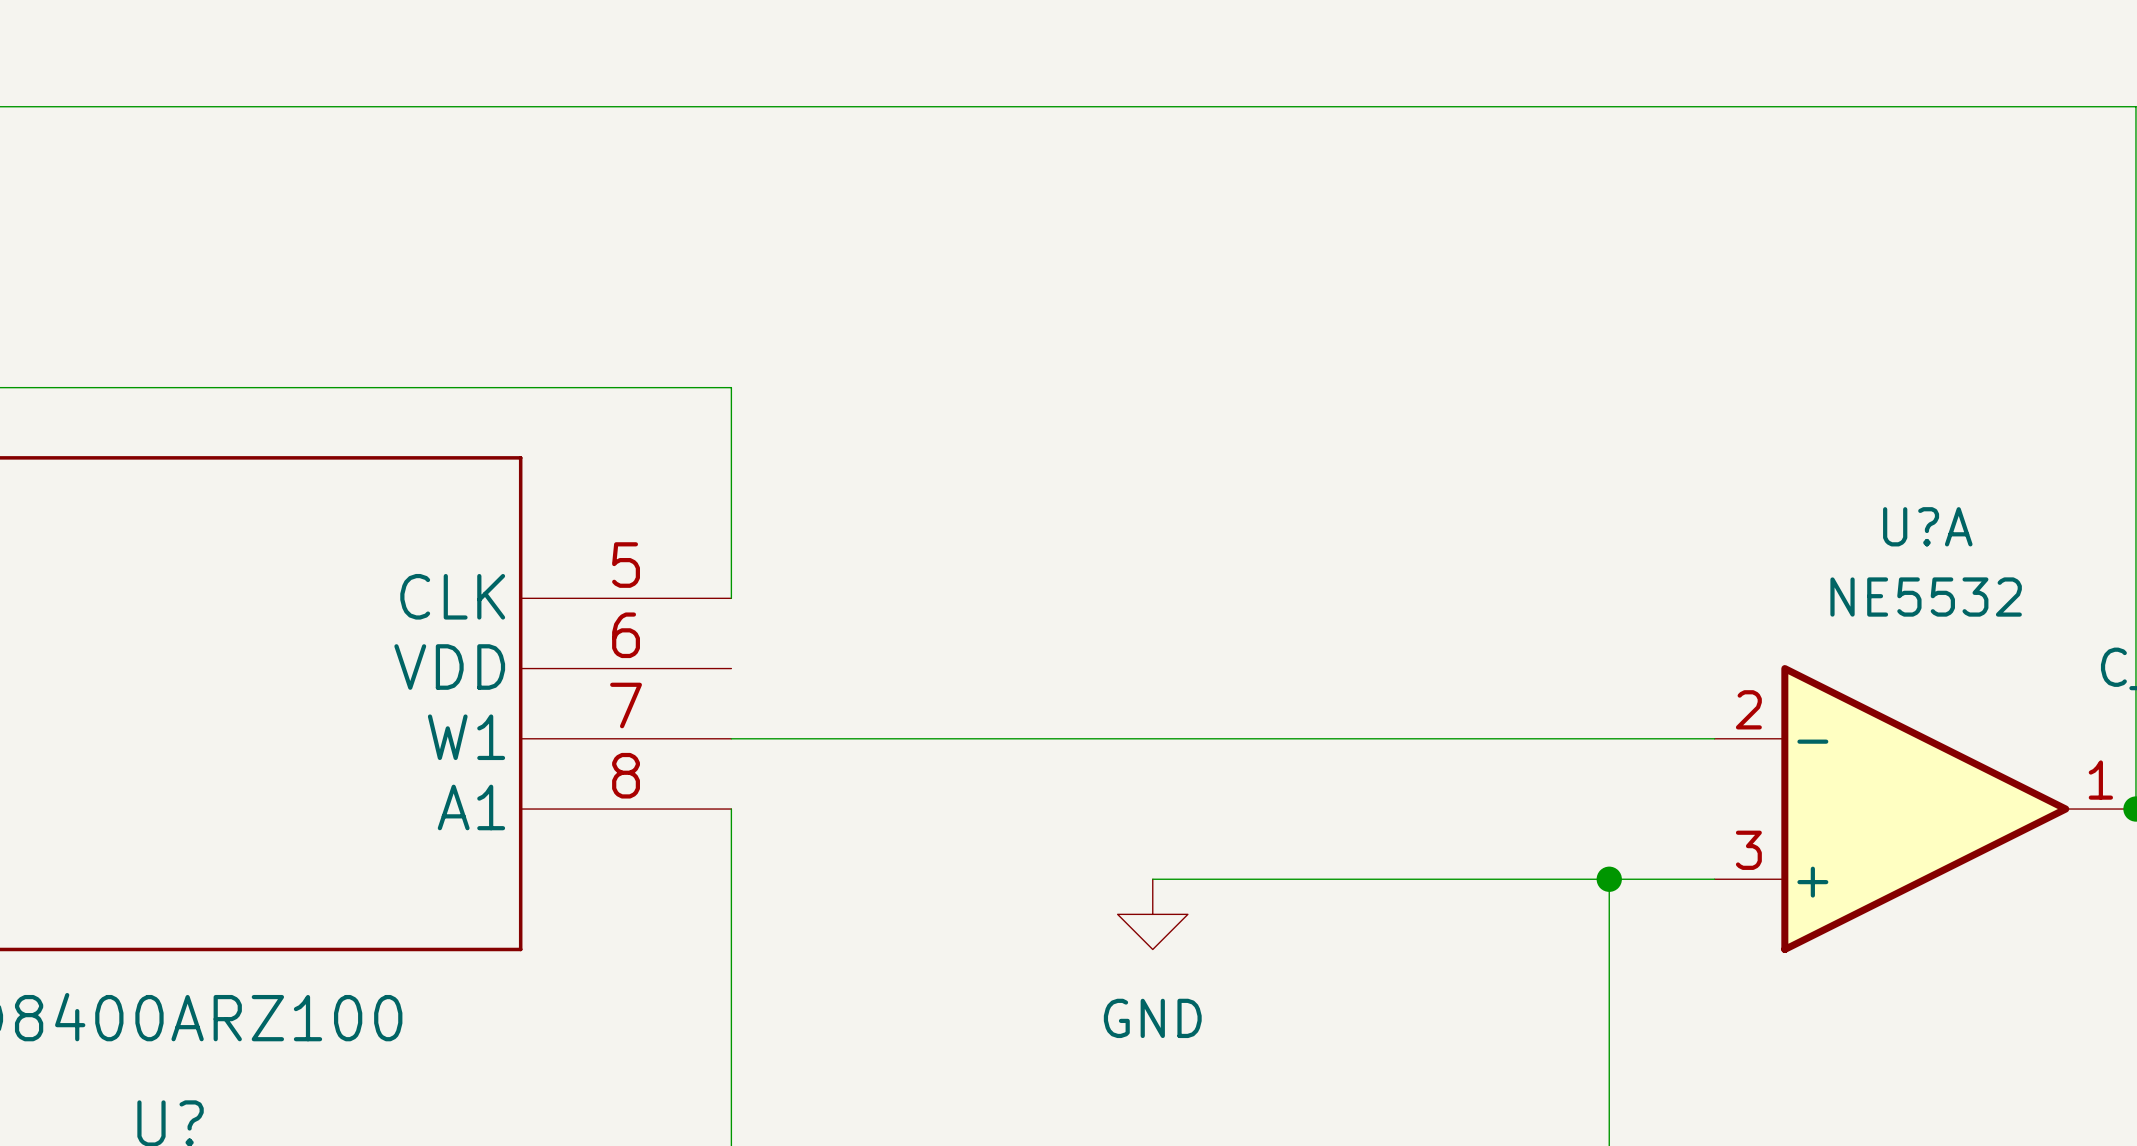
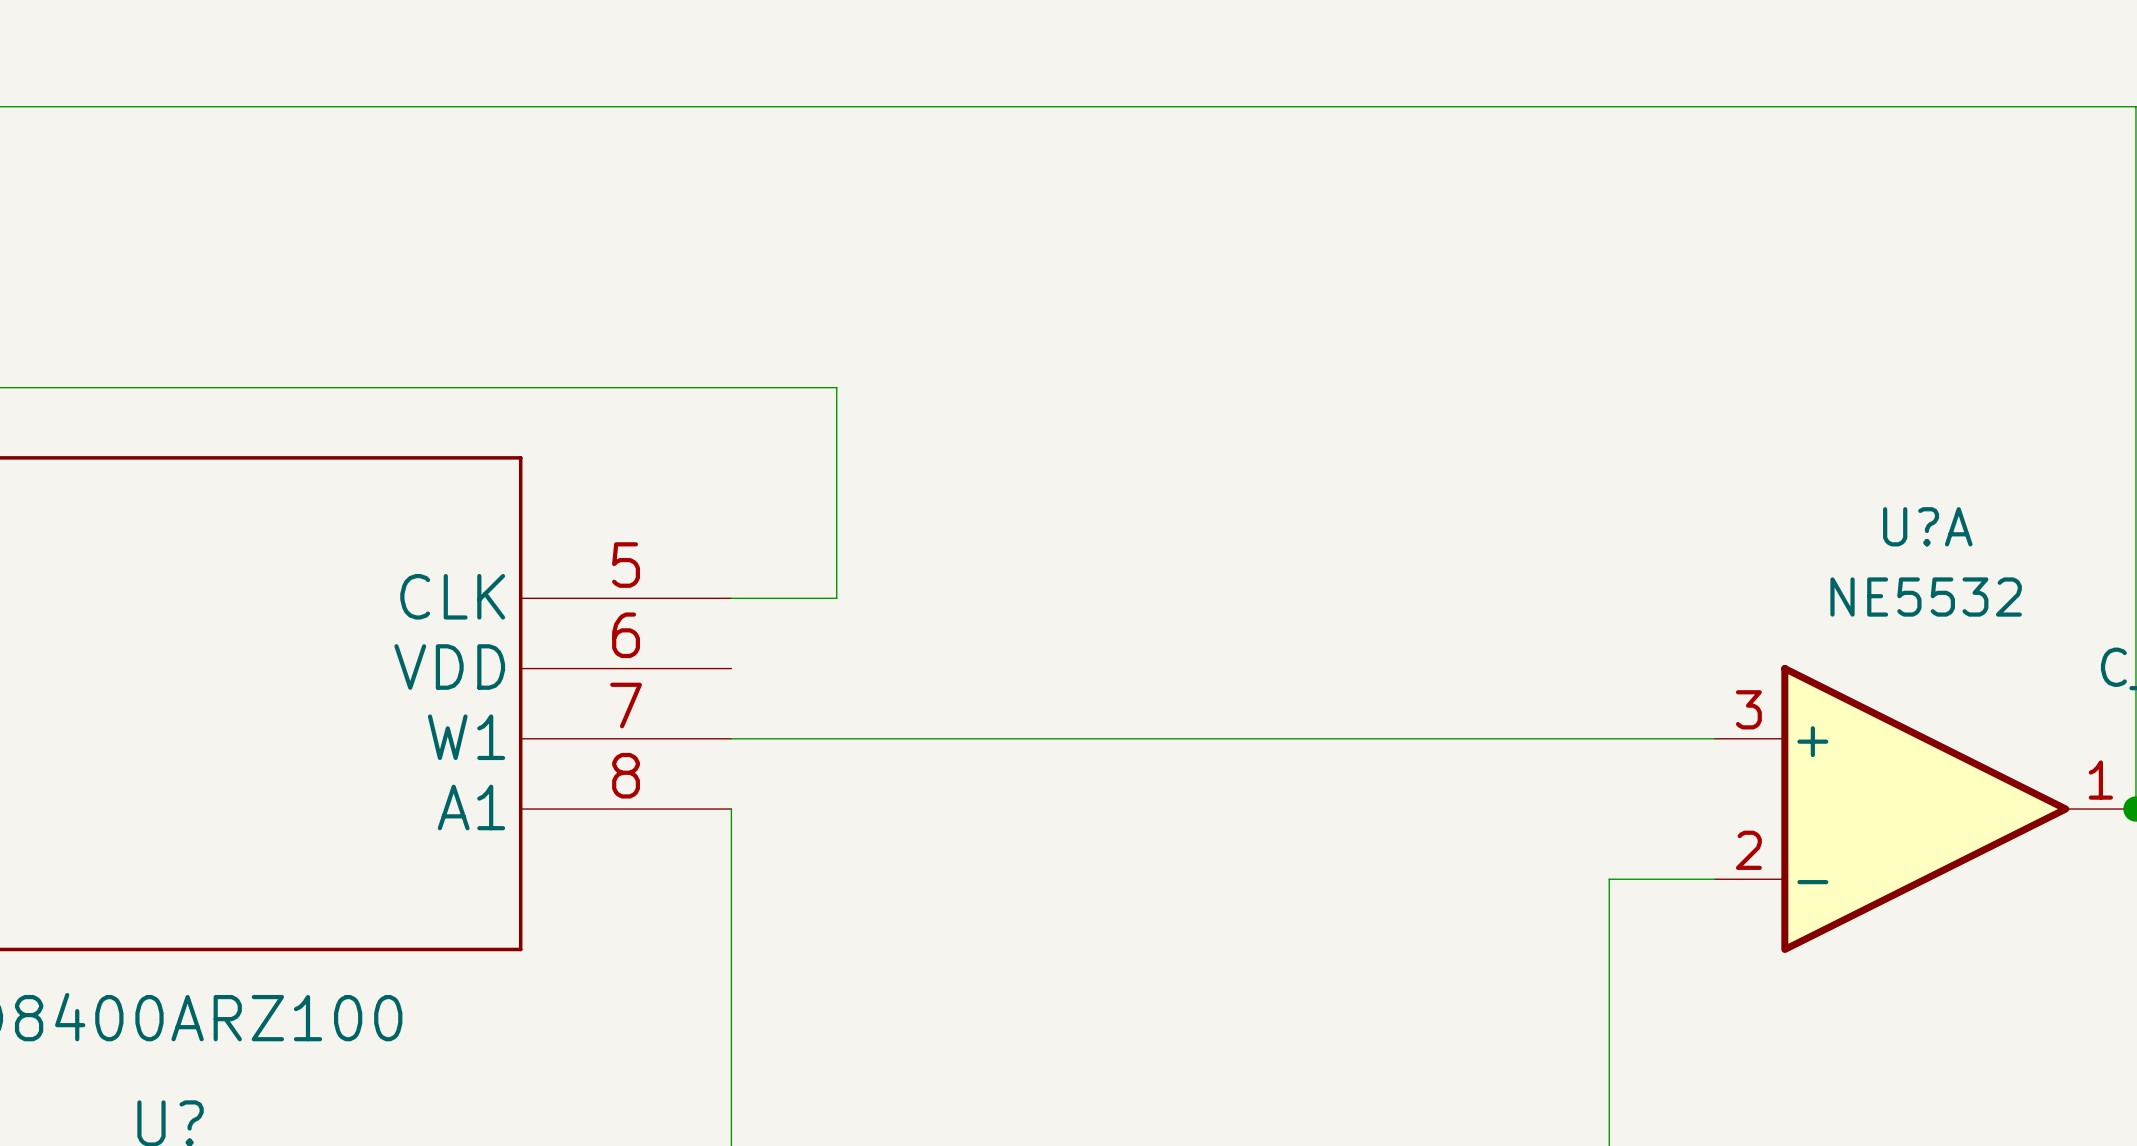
wire: (731, 387) (731, 598) -> (731, 387) (836, 387) (836, 598) (731, 598)
U?A flip: as is (1925, 809) -> up-down (1925, 809)
wire: (1152, 879) (1609, 879) -> none
junction: (1609, 879) -> none
power symbol: GND (1152, 914) -> none

